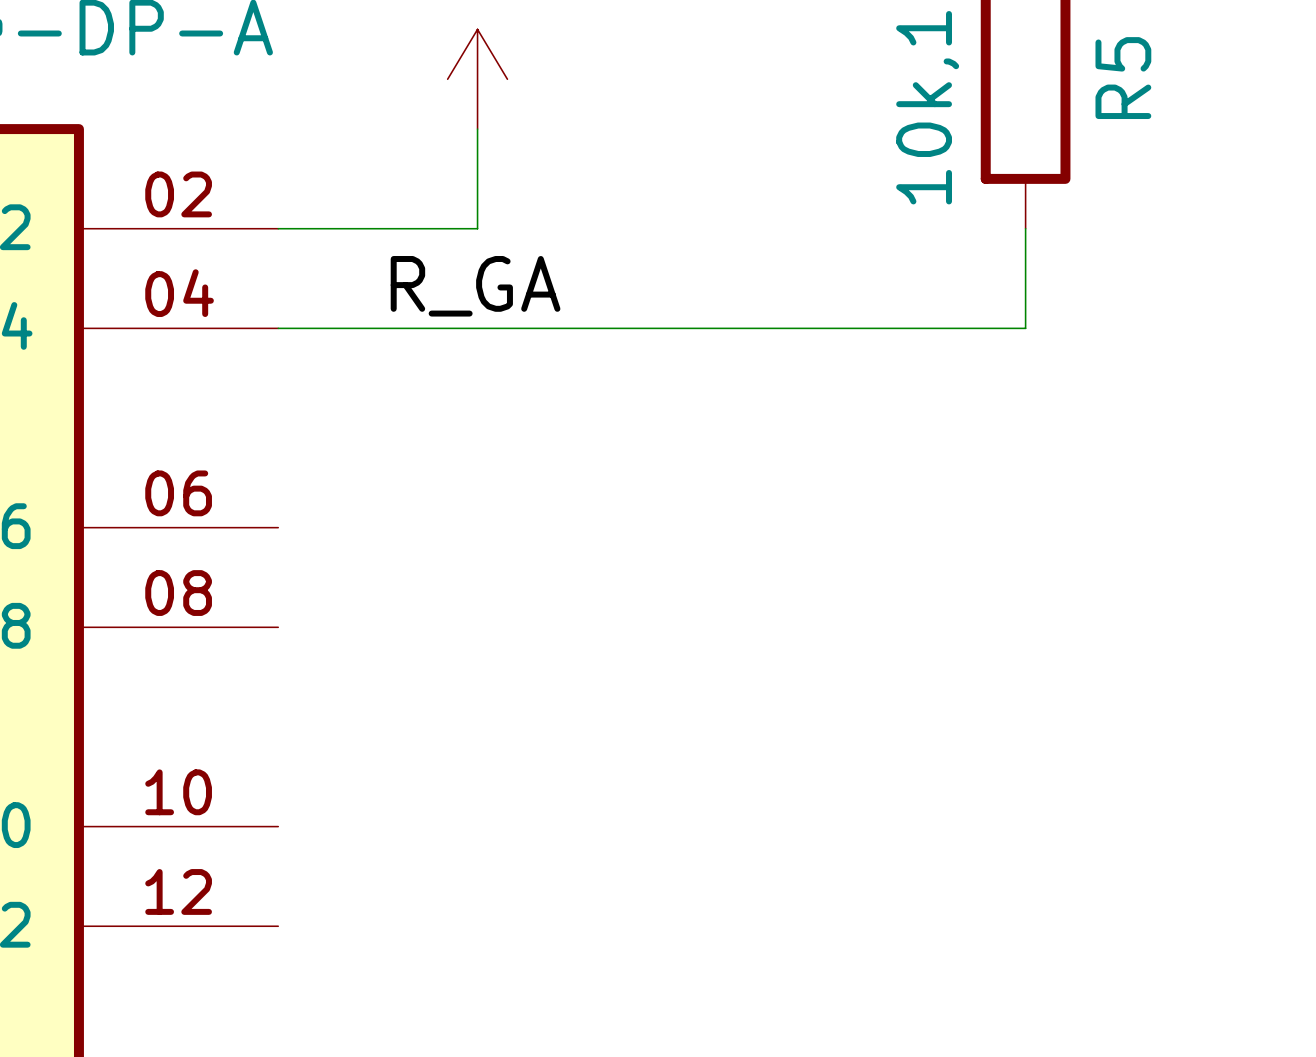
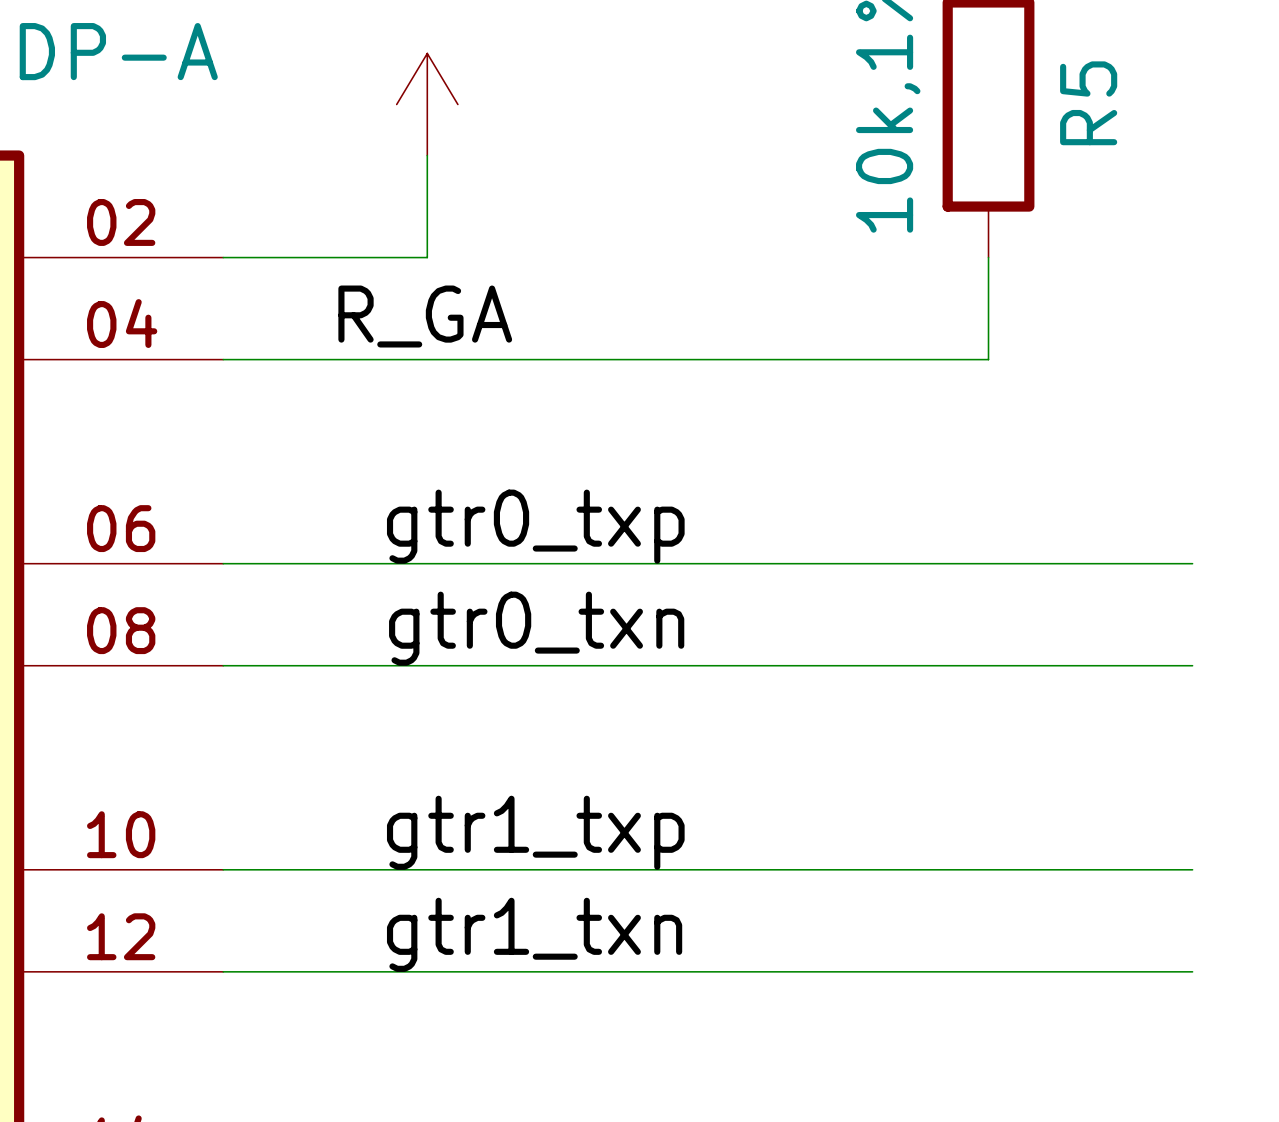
label: none -> gtr0_txp (535, 526)
wire: none -> (223, 563) (1192, 563)
label: none -> gtr0_txn (536, 628)
wire: none -> (223, 665) (1192, 665)
label: none -> gtr1_txp (535, 832)
wire: none -> (223, 869) (1192, 869)
label: none -> gtr1_txn (534, 934)
wire: none -> (223, 971) (1192, 971)

